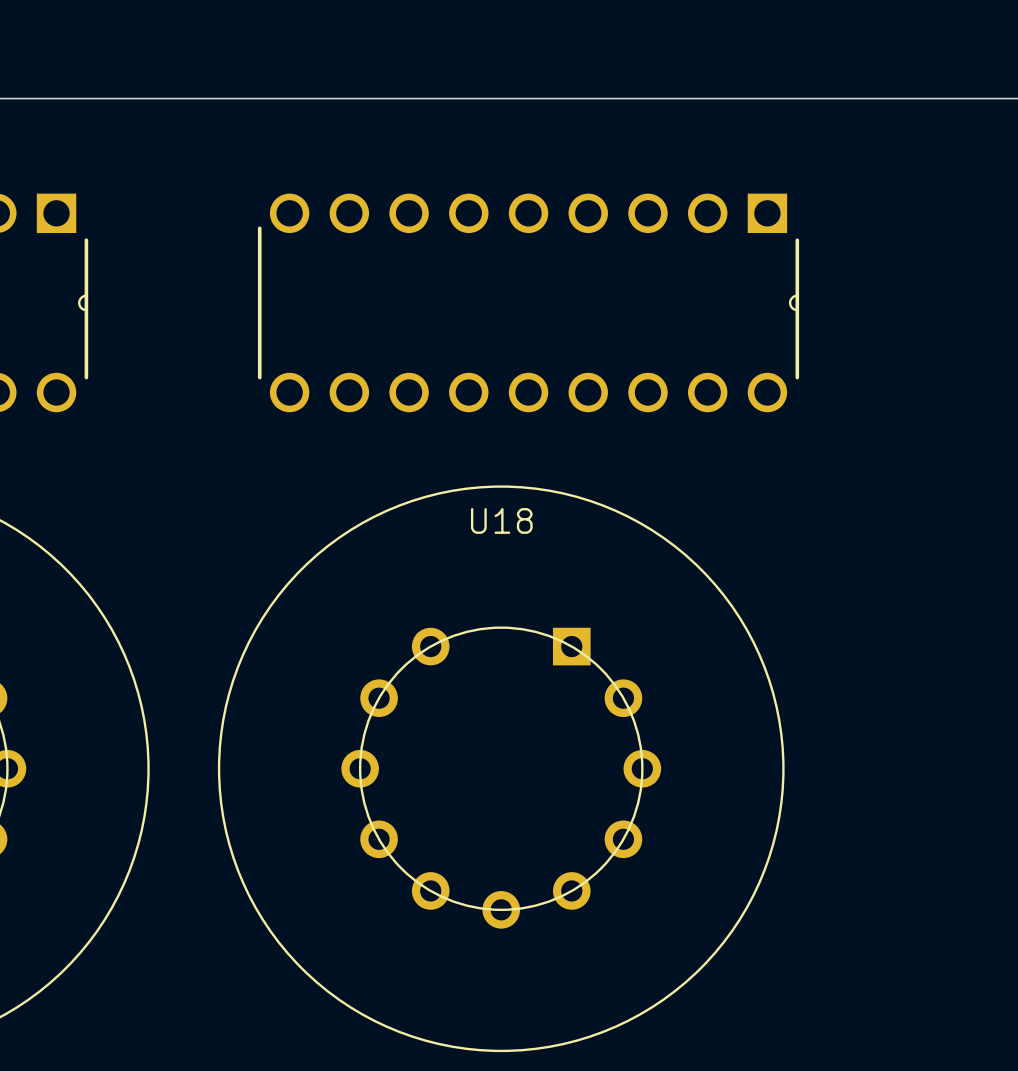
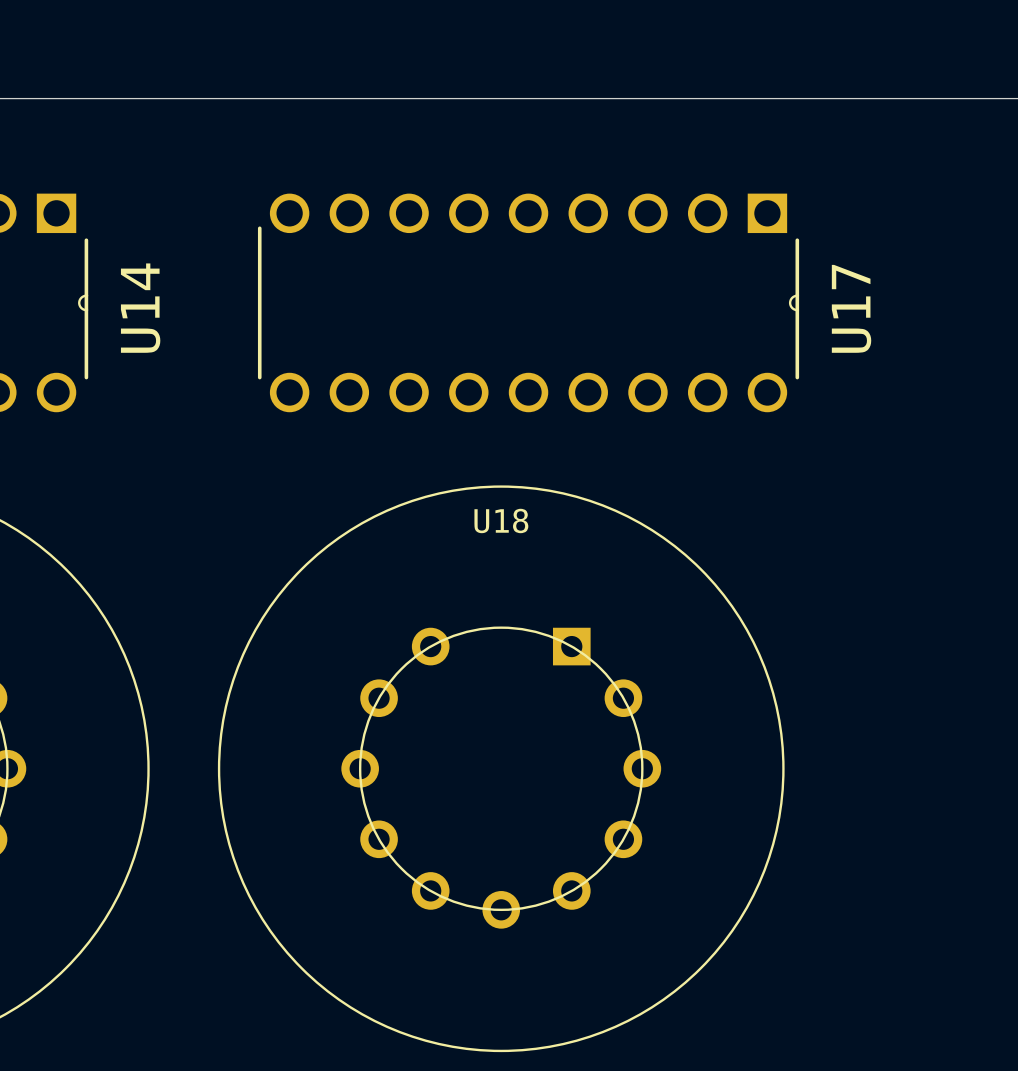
U14 name: none -> U14 (140, 308)
U17 name: none -> U17 (851, 308)

